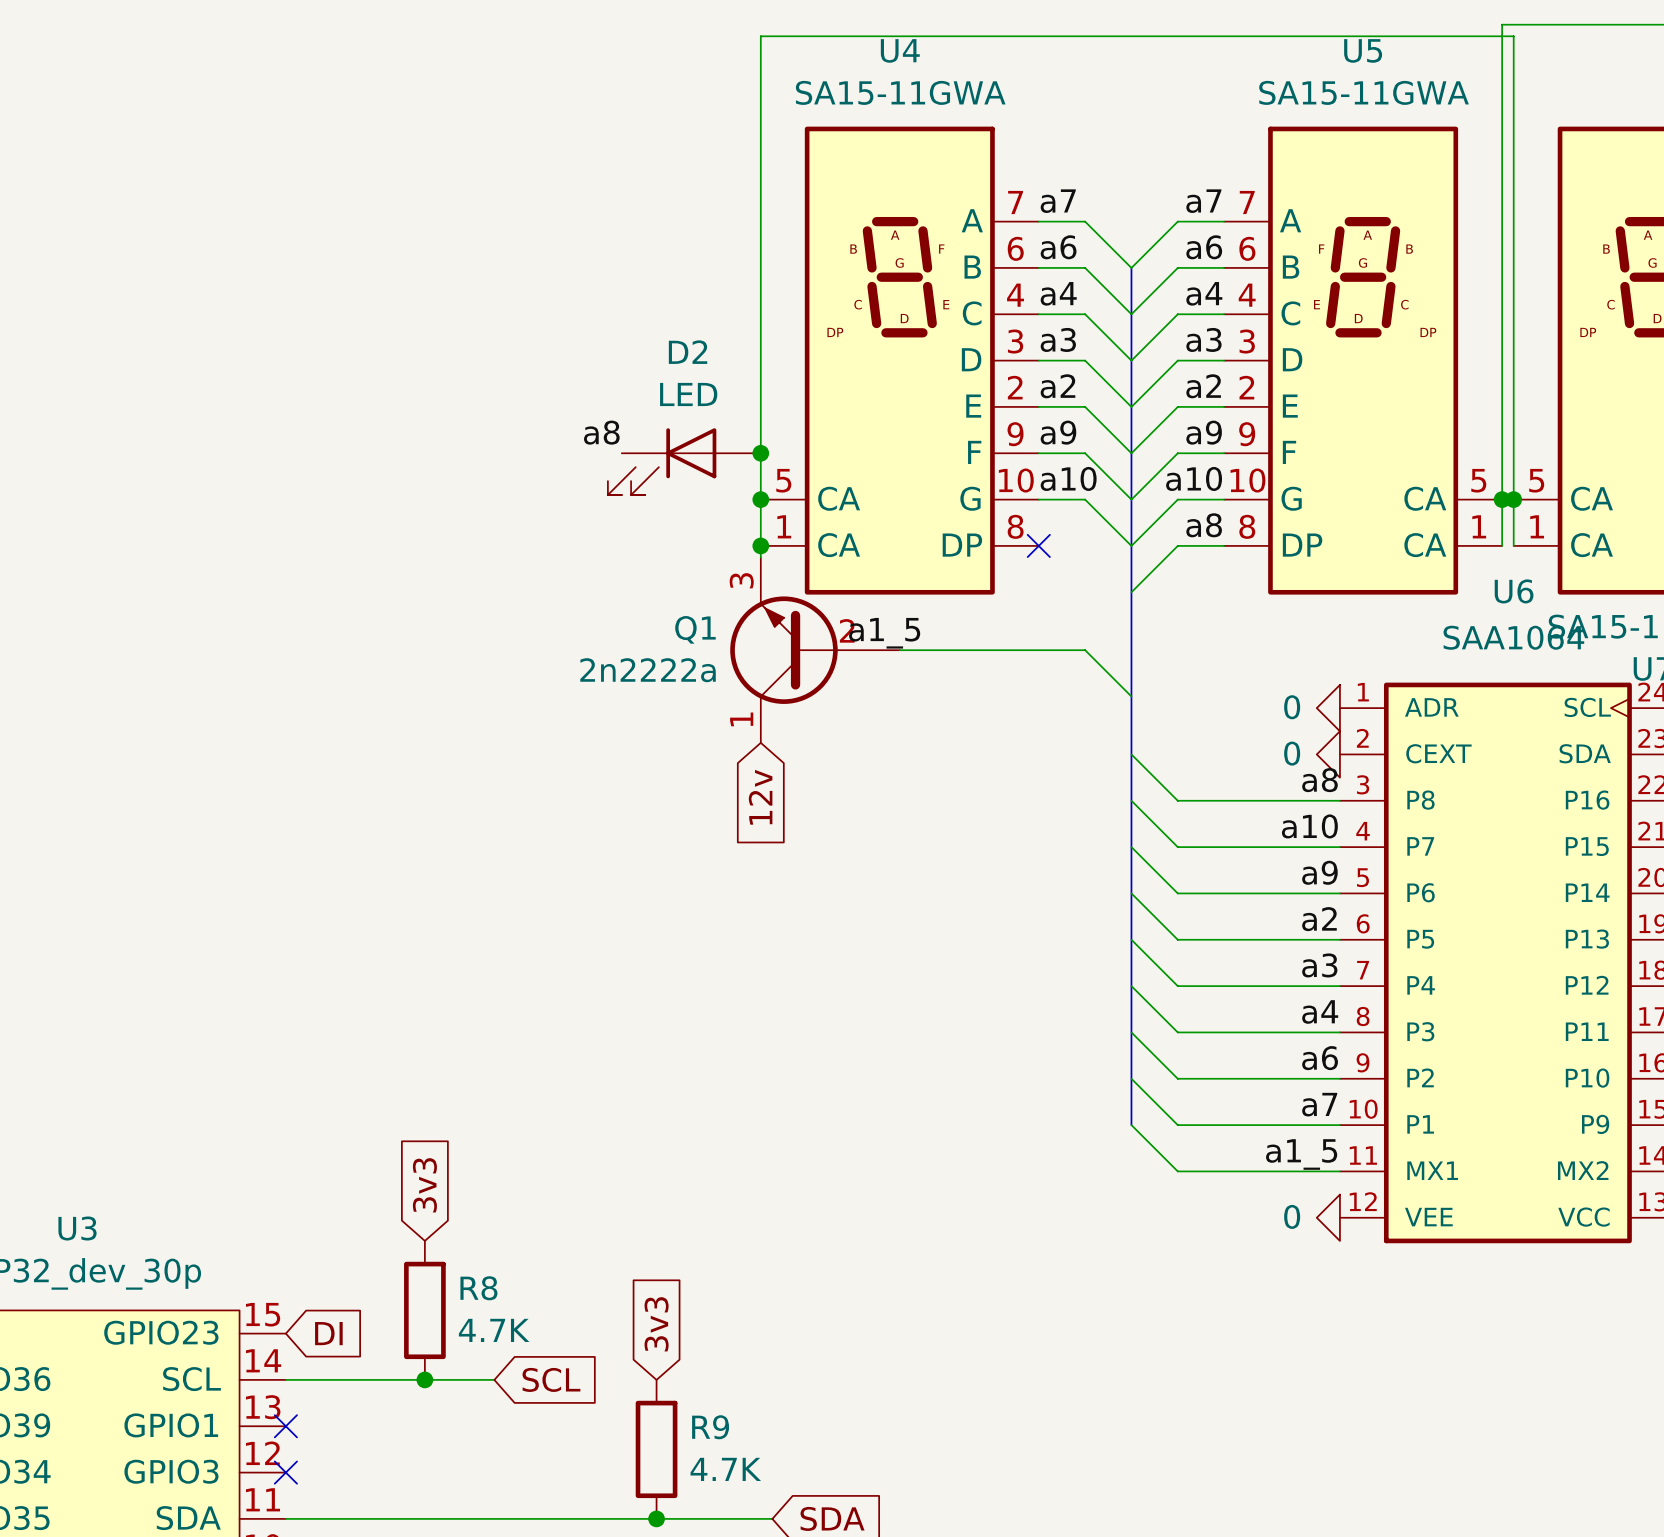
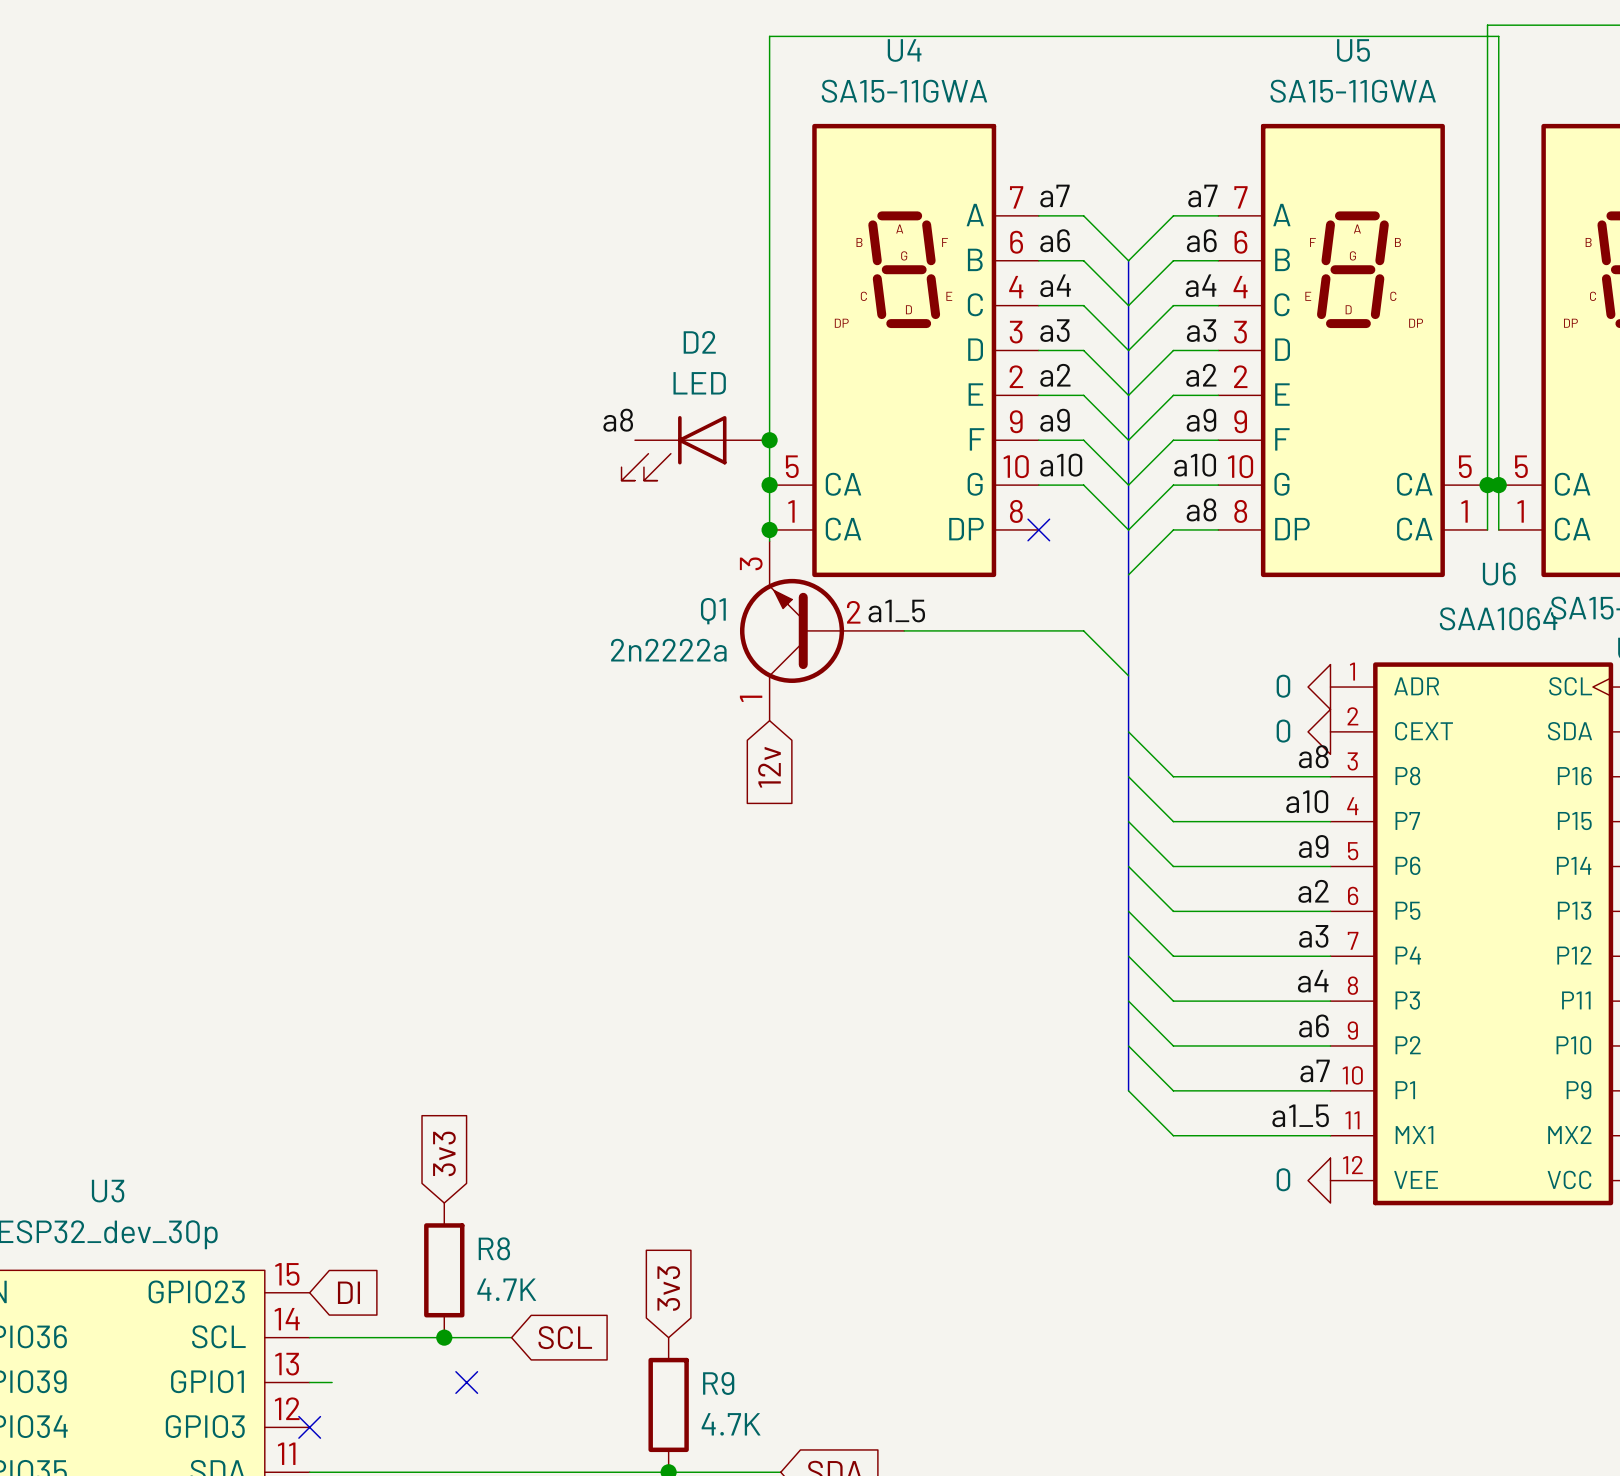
wire: none -> (309, 1382) (332, 1382)
no-connect mark: (285, 1426) -> none
no-connect mark: none -> (466, 1382)

